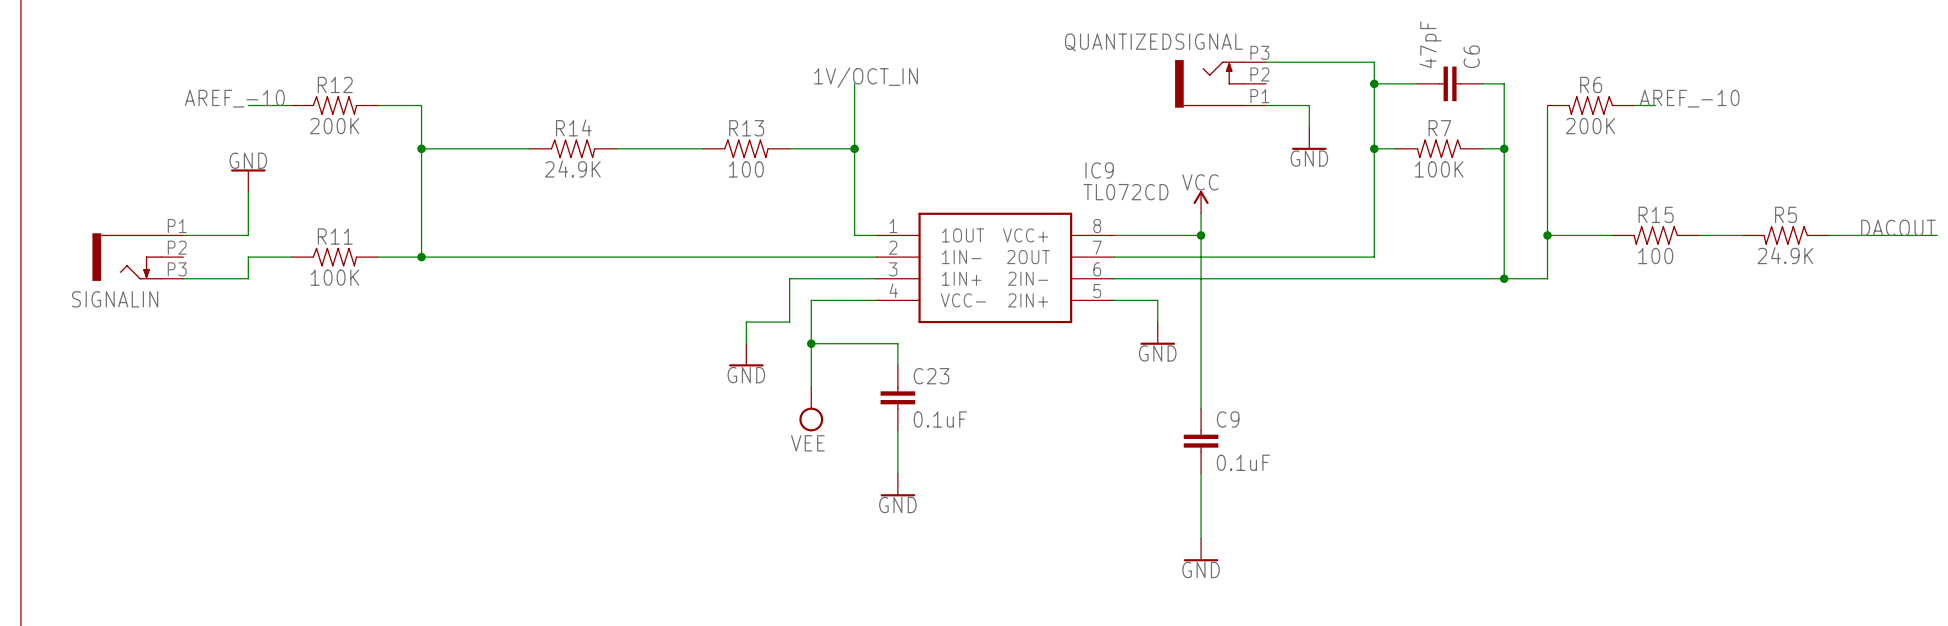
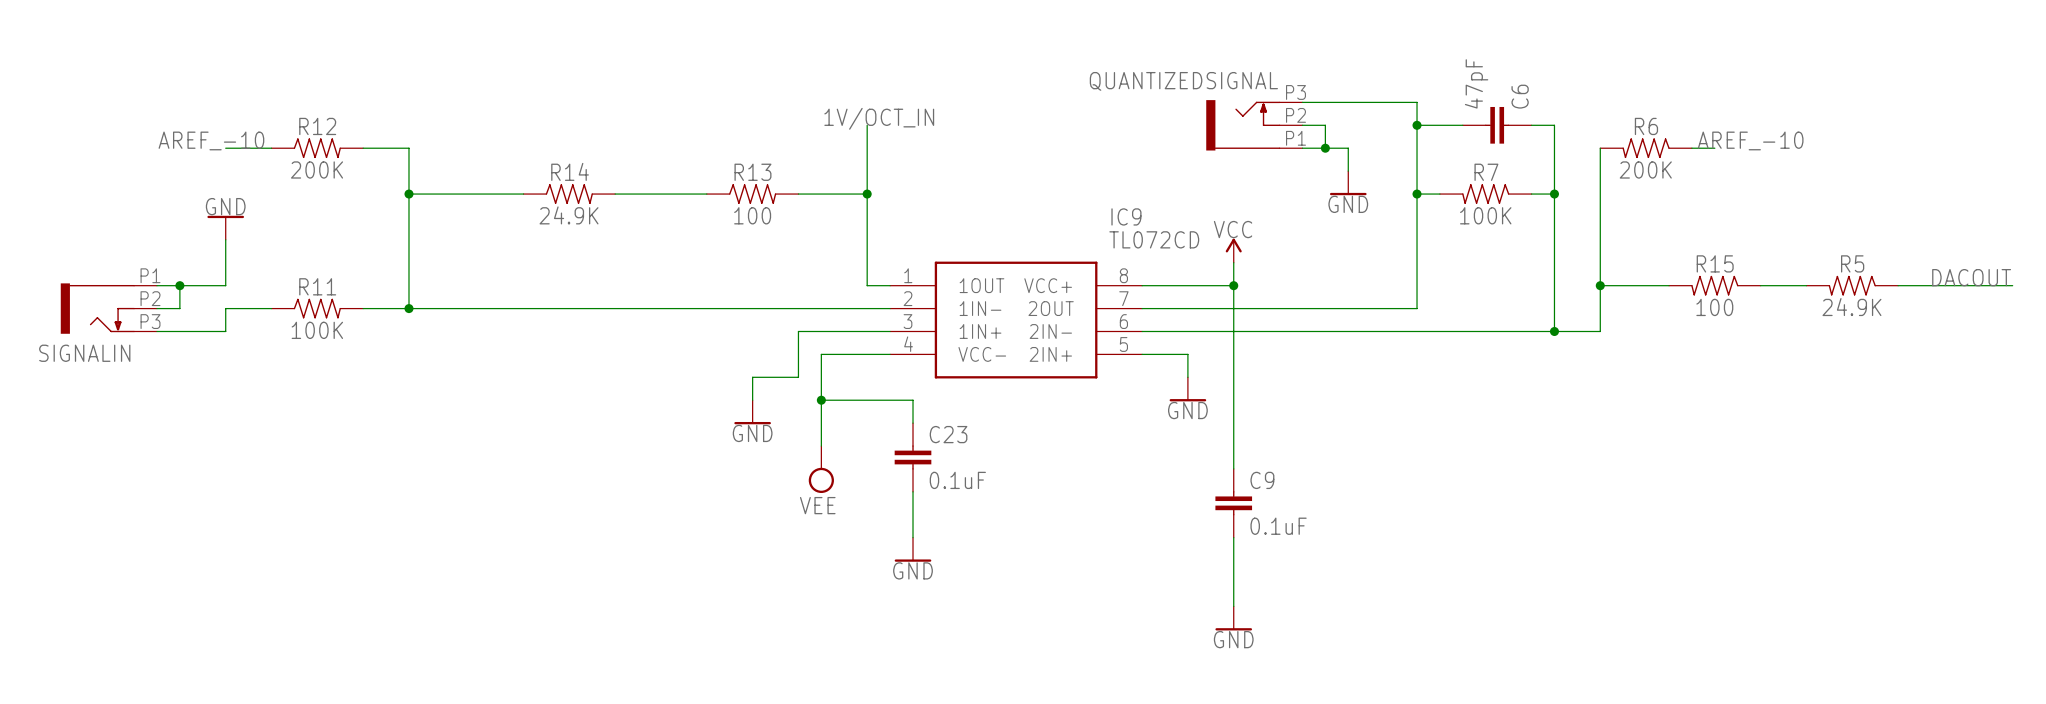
wire: none -> (1302, 125) (1325, 125) (1325, 148)
junction: none -> (1325, 148)
wire: none -> (179, 285) (179, 308) (156, 308)
junction: none -> (179, 285)

